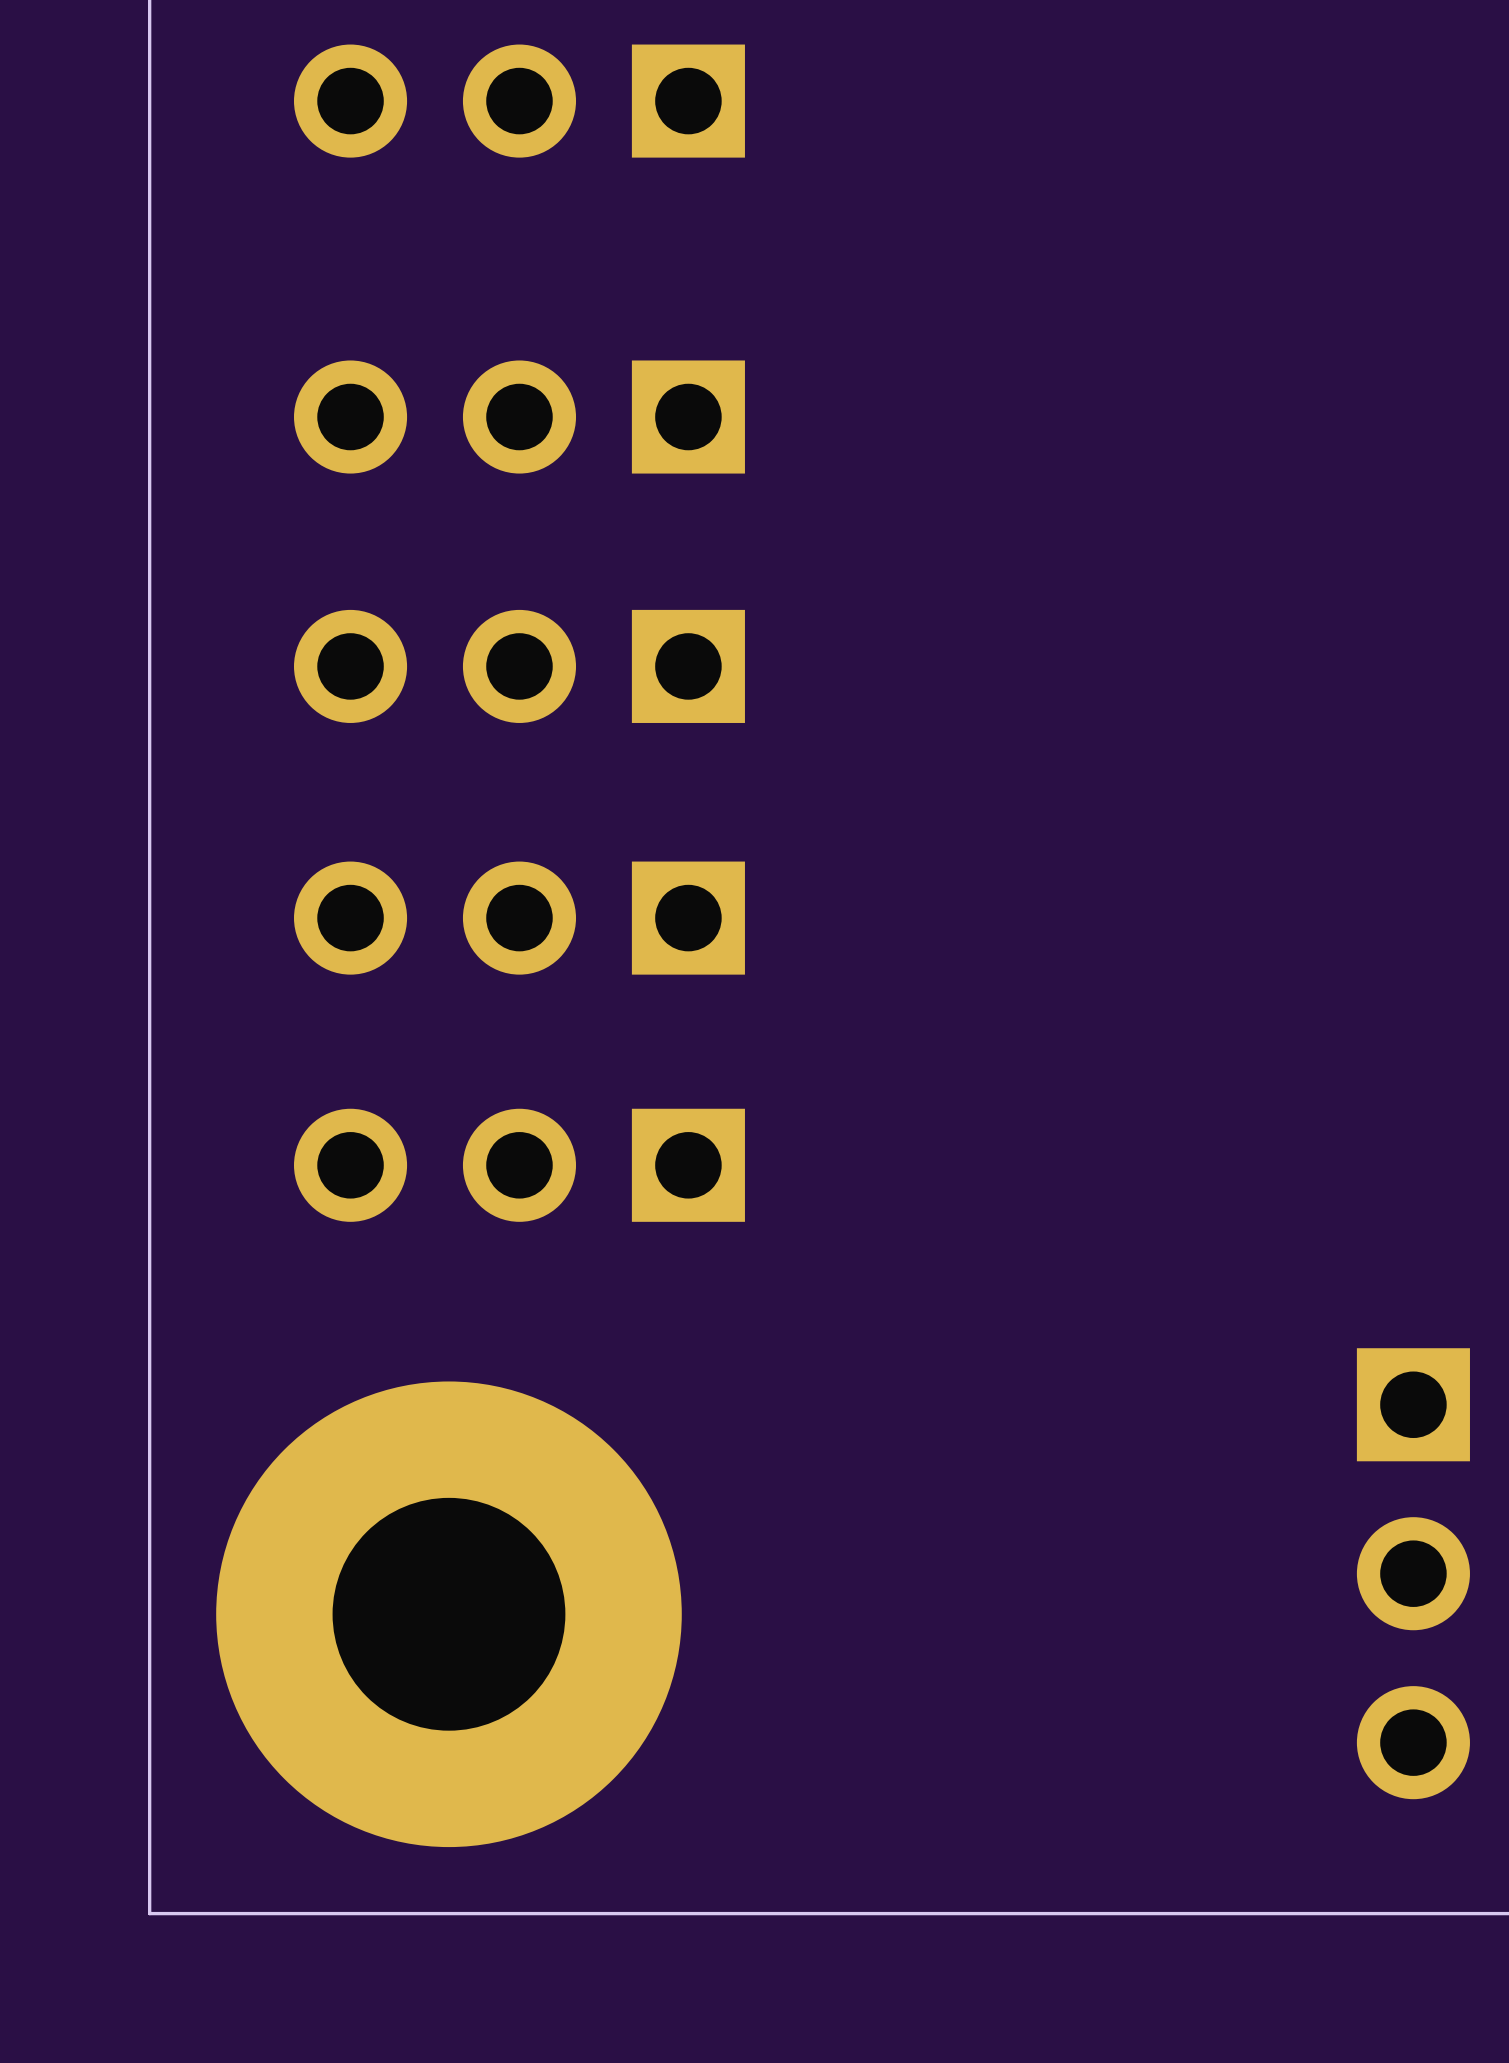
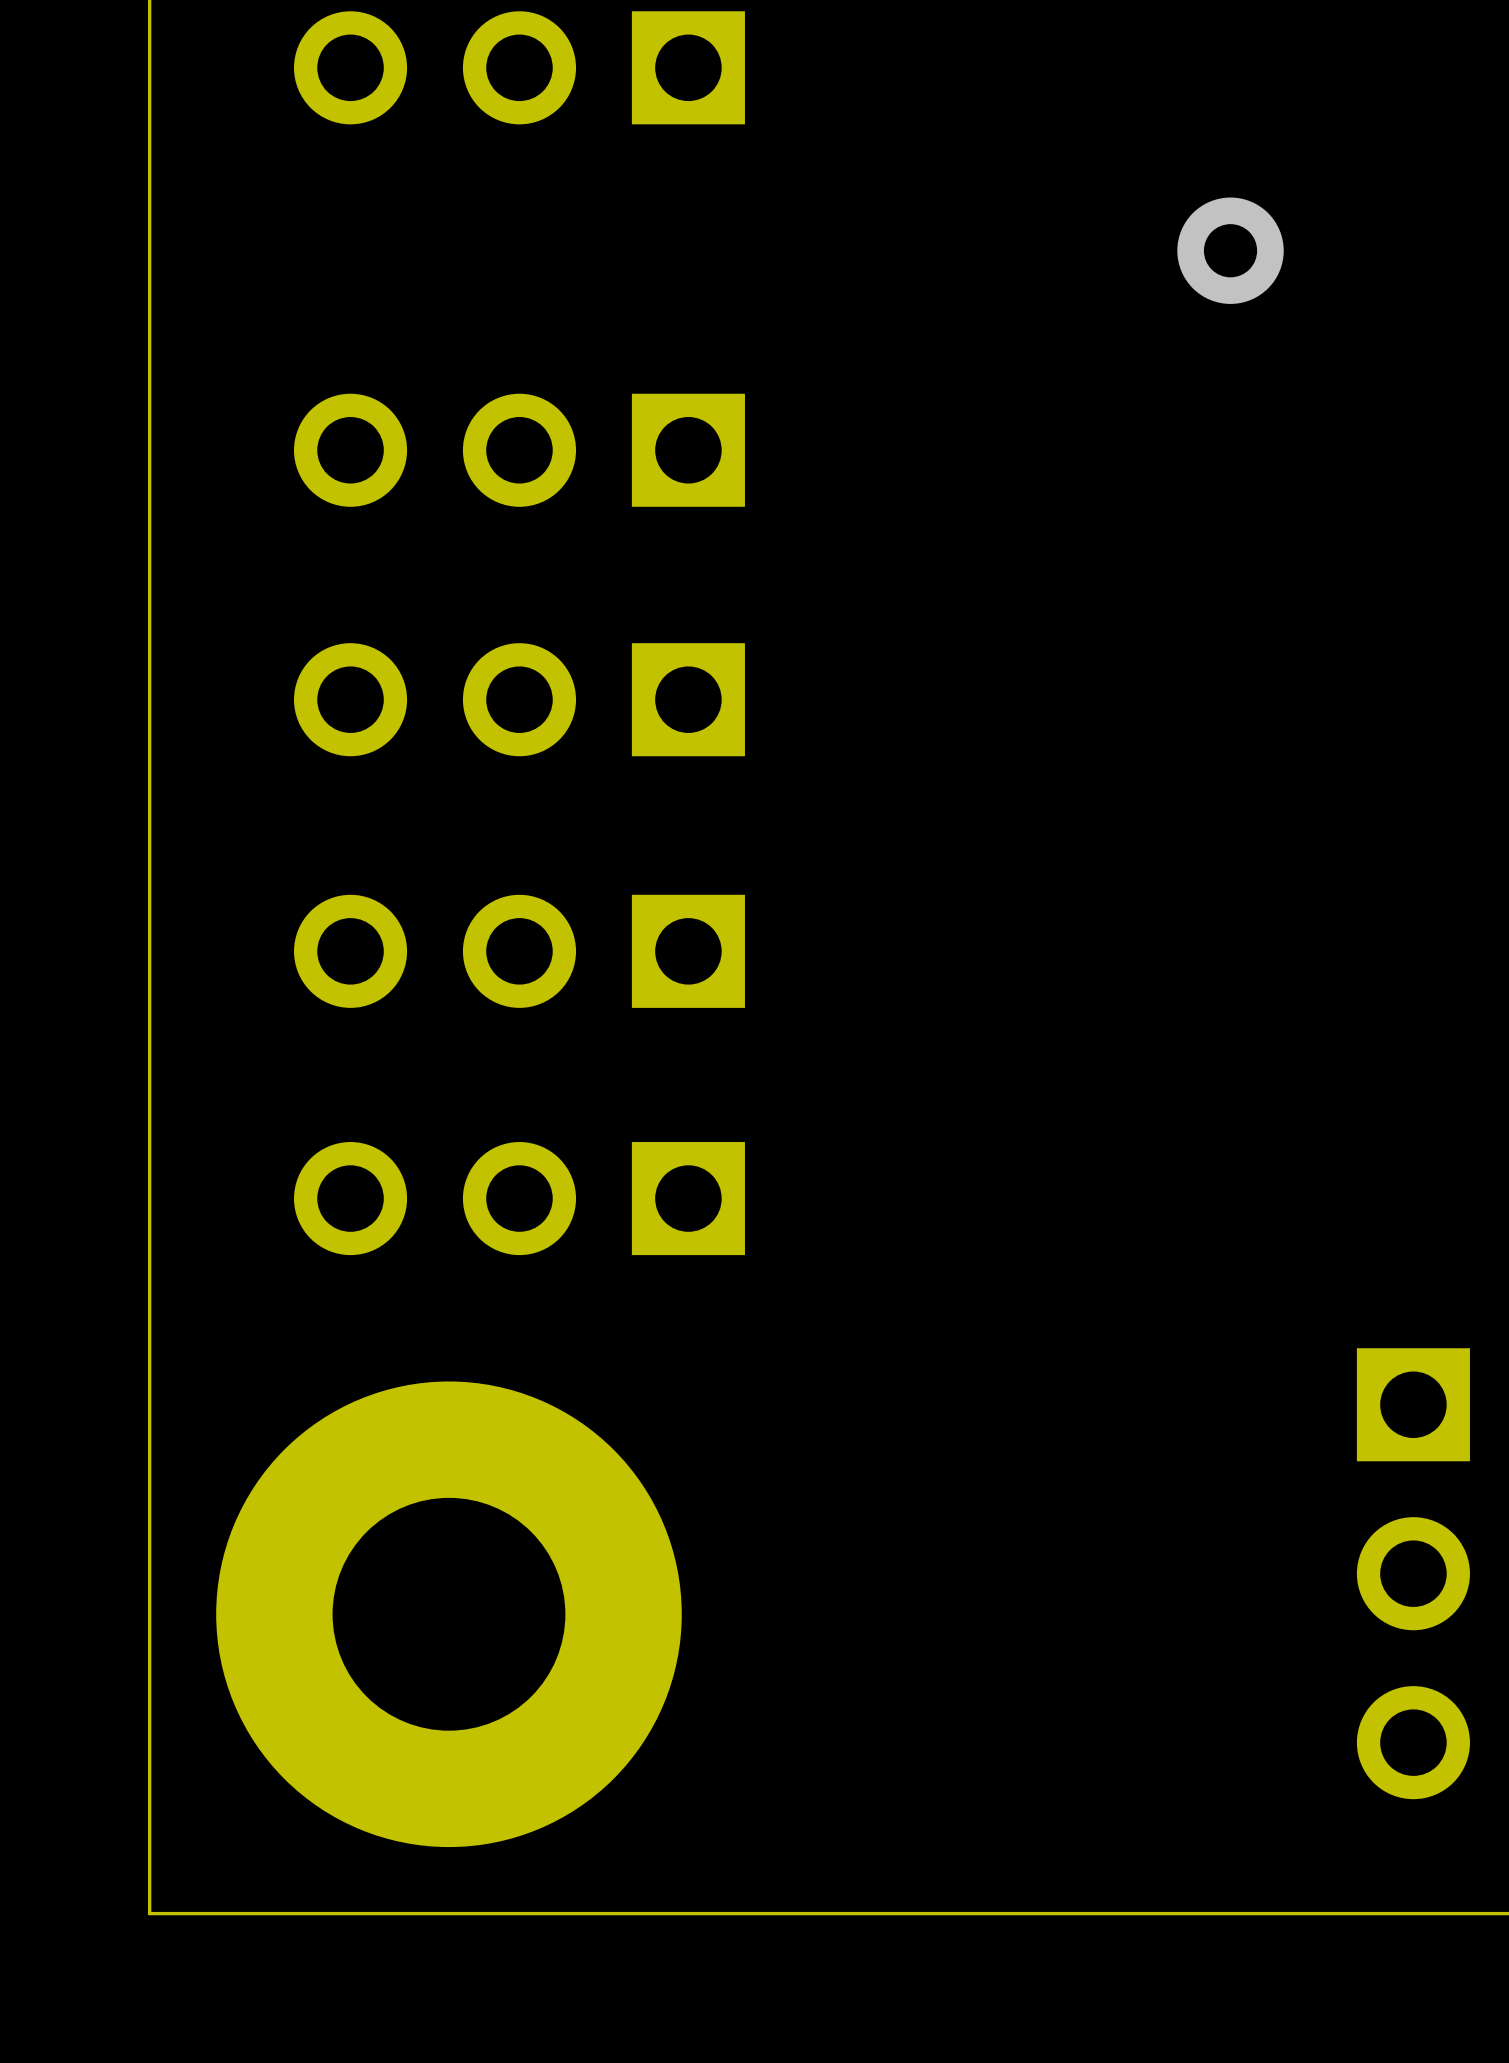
part position: (519, 101) -> (519, 67)
via: none -> (1230, 250)
part position: (519, 417) -> (519, 450)
part position: (519, 666) -> (519, 699)
part position: (519, 918) -> (519, 951)
part position: (519, 1165) -> (519, 1198)

